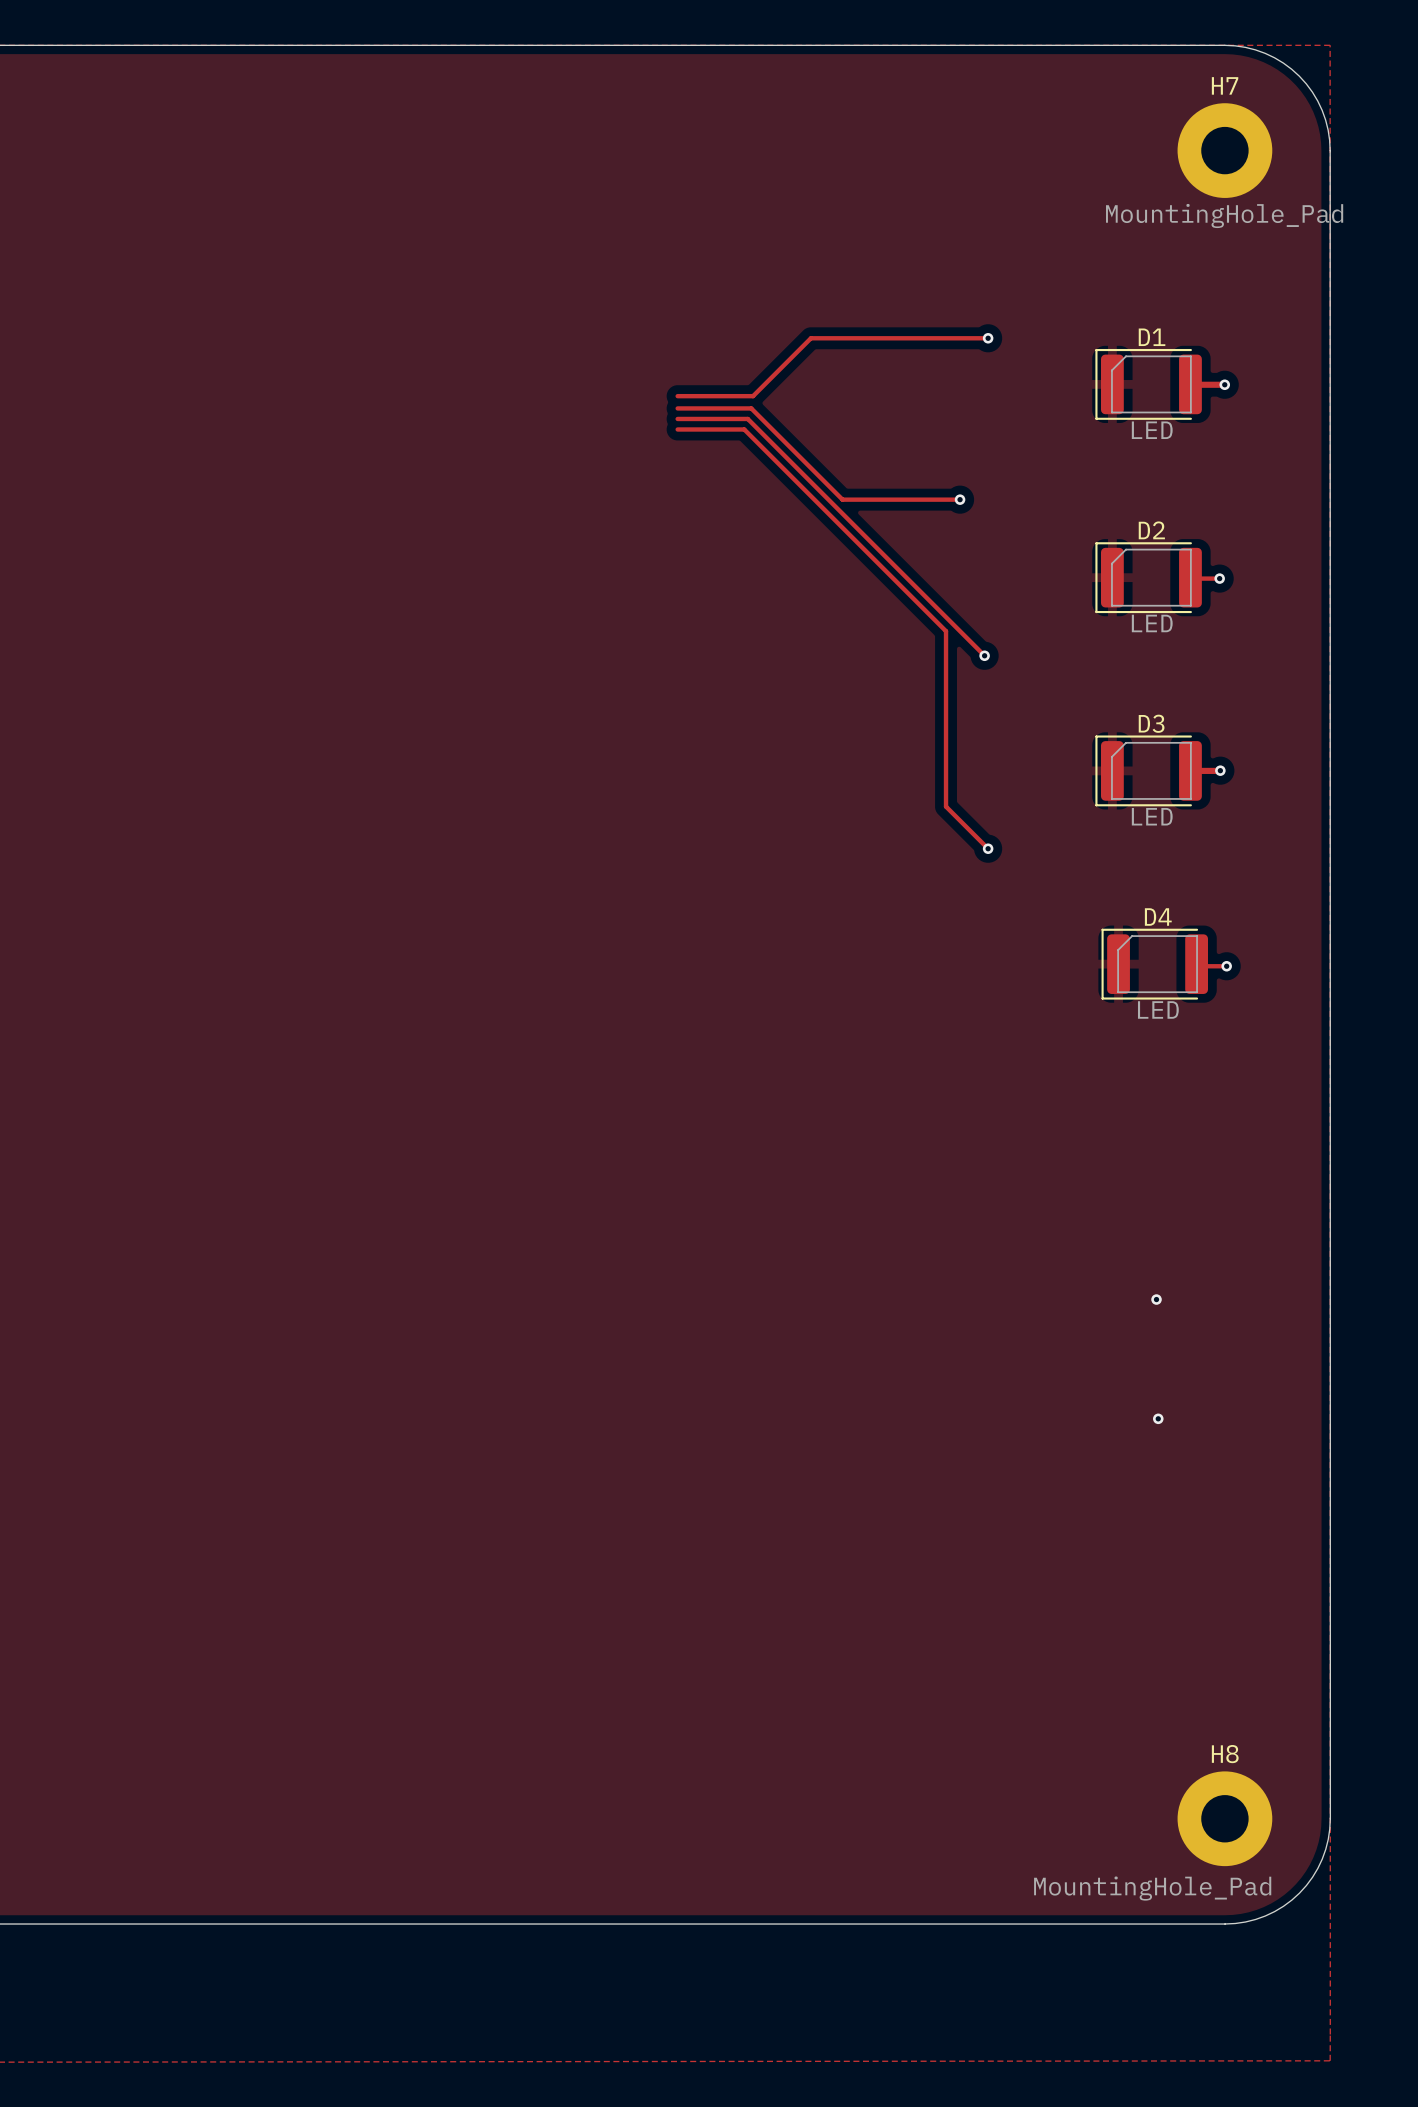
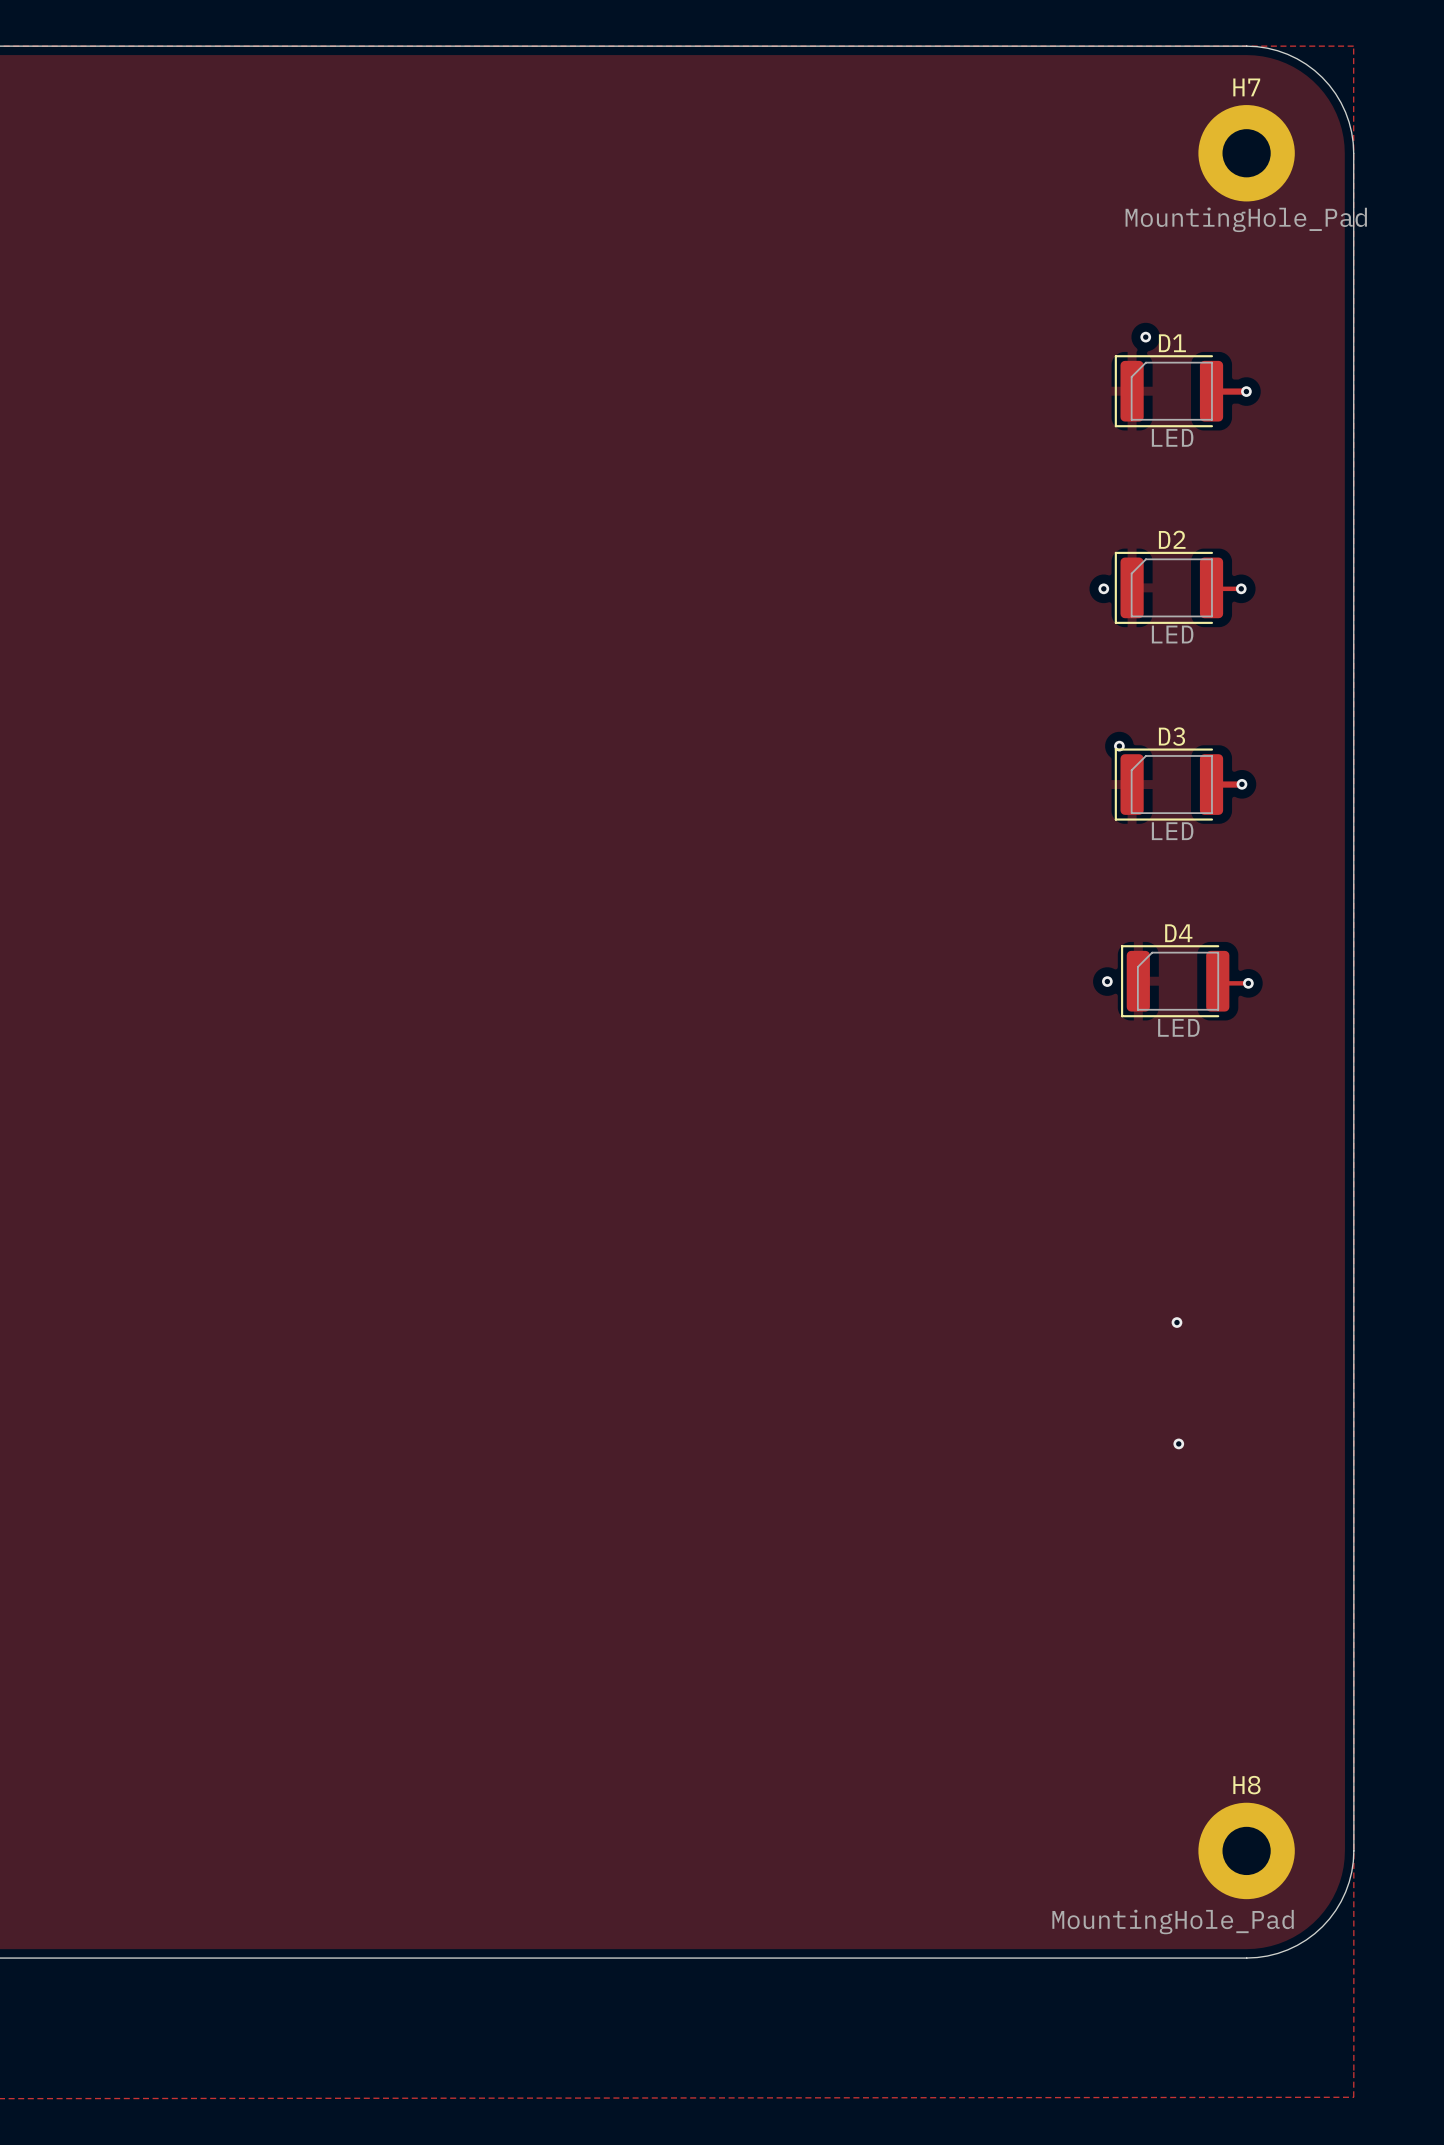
via: none -> (1145, 337)
track: (988, 338) (810, 338) (753, 396) (677, 396) -> none
via: (988, 338) -> none
track: (677, 408) (751, 408) (842, 499) (960, 499) -> none
track: (677, 418) (747, 418) (984, 655) -> none
track: (677, 429) (744, 429) (946, 631) (946, 806) (988, 848) -> none
via: (960, 499) -> none
via: none -> (1103, 588)
via: (984, 655) -> none
via: none -> (1119, 746)
via: (988, 848) -> none
via: none -> (1107, 981)

